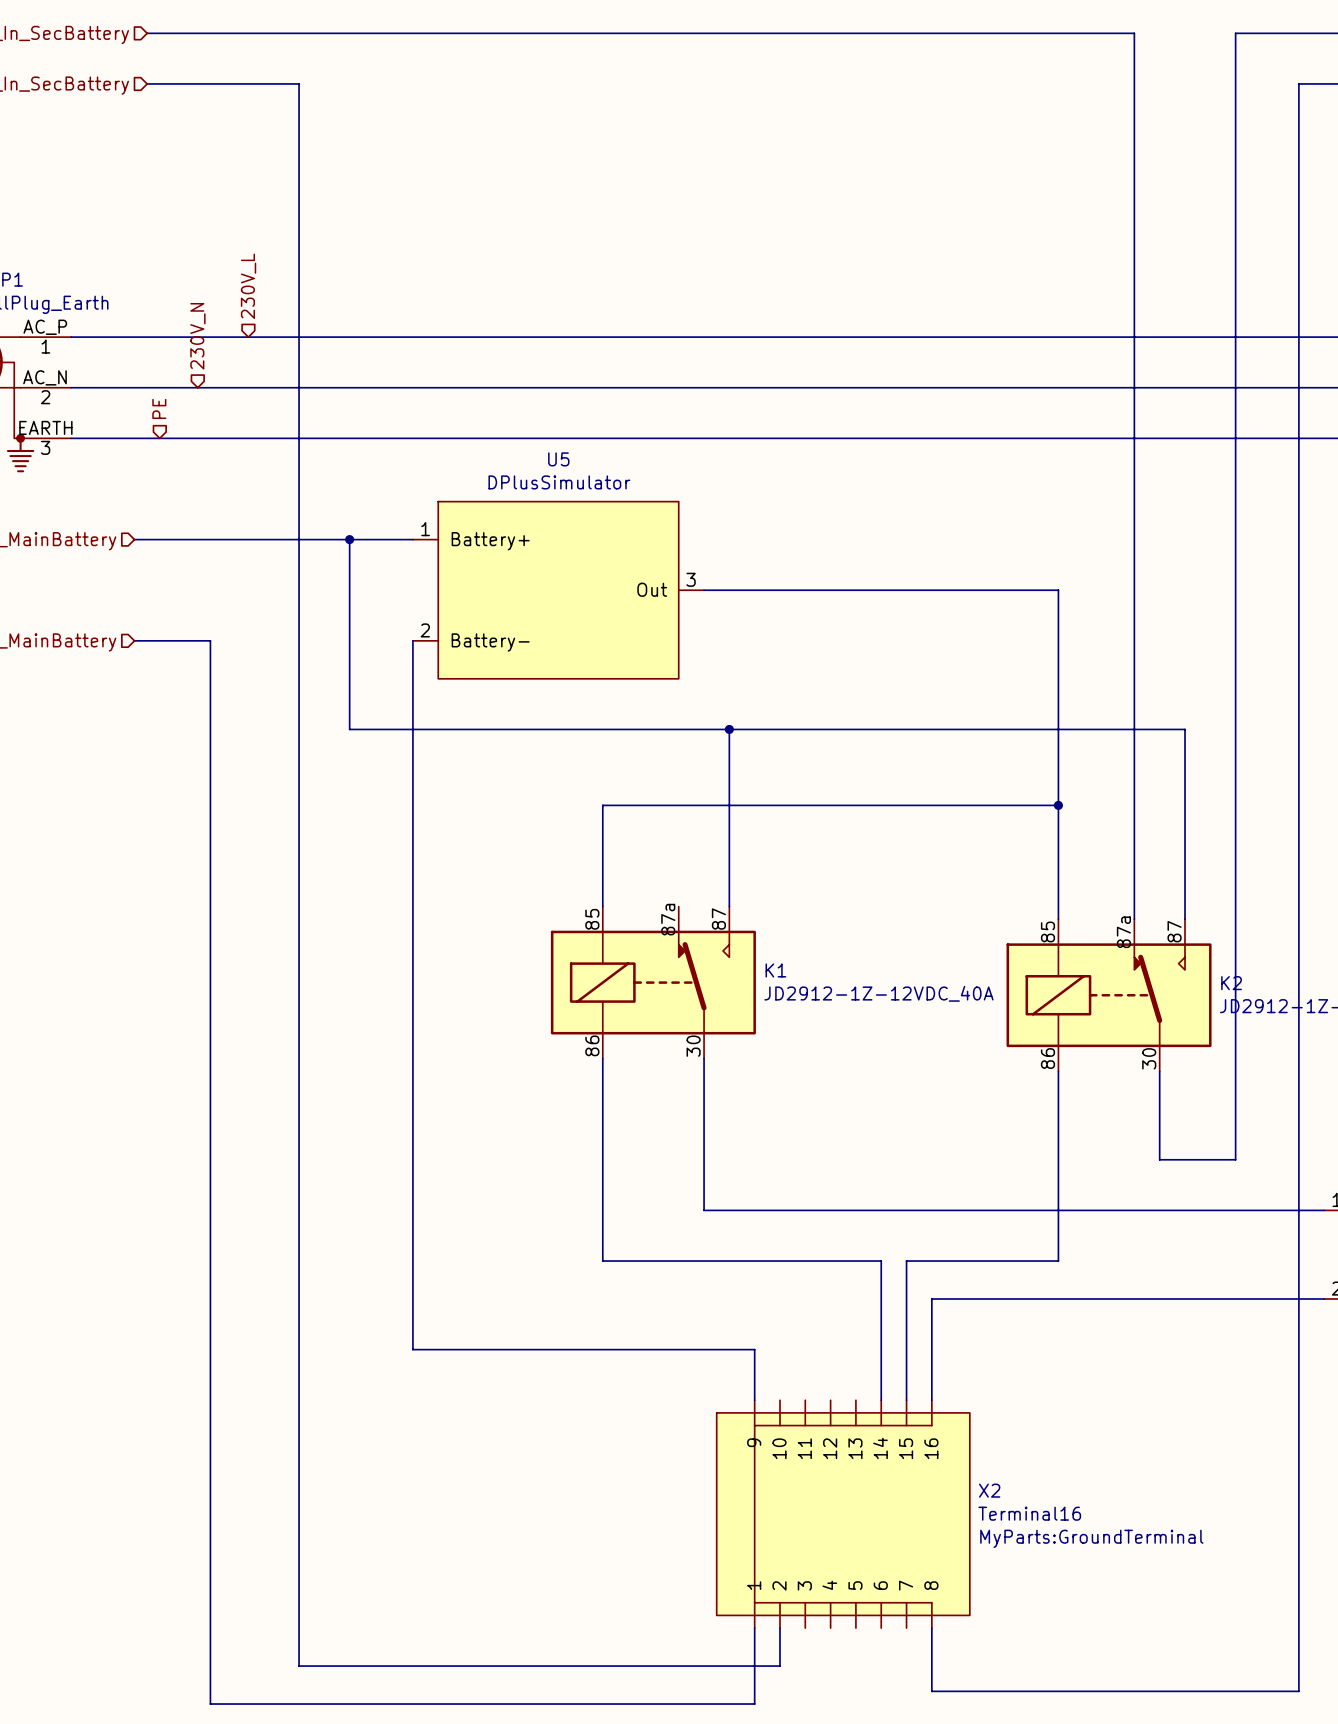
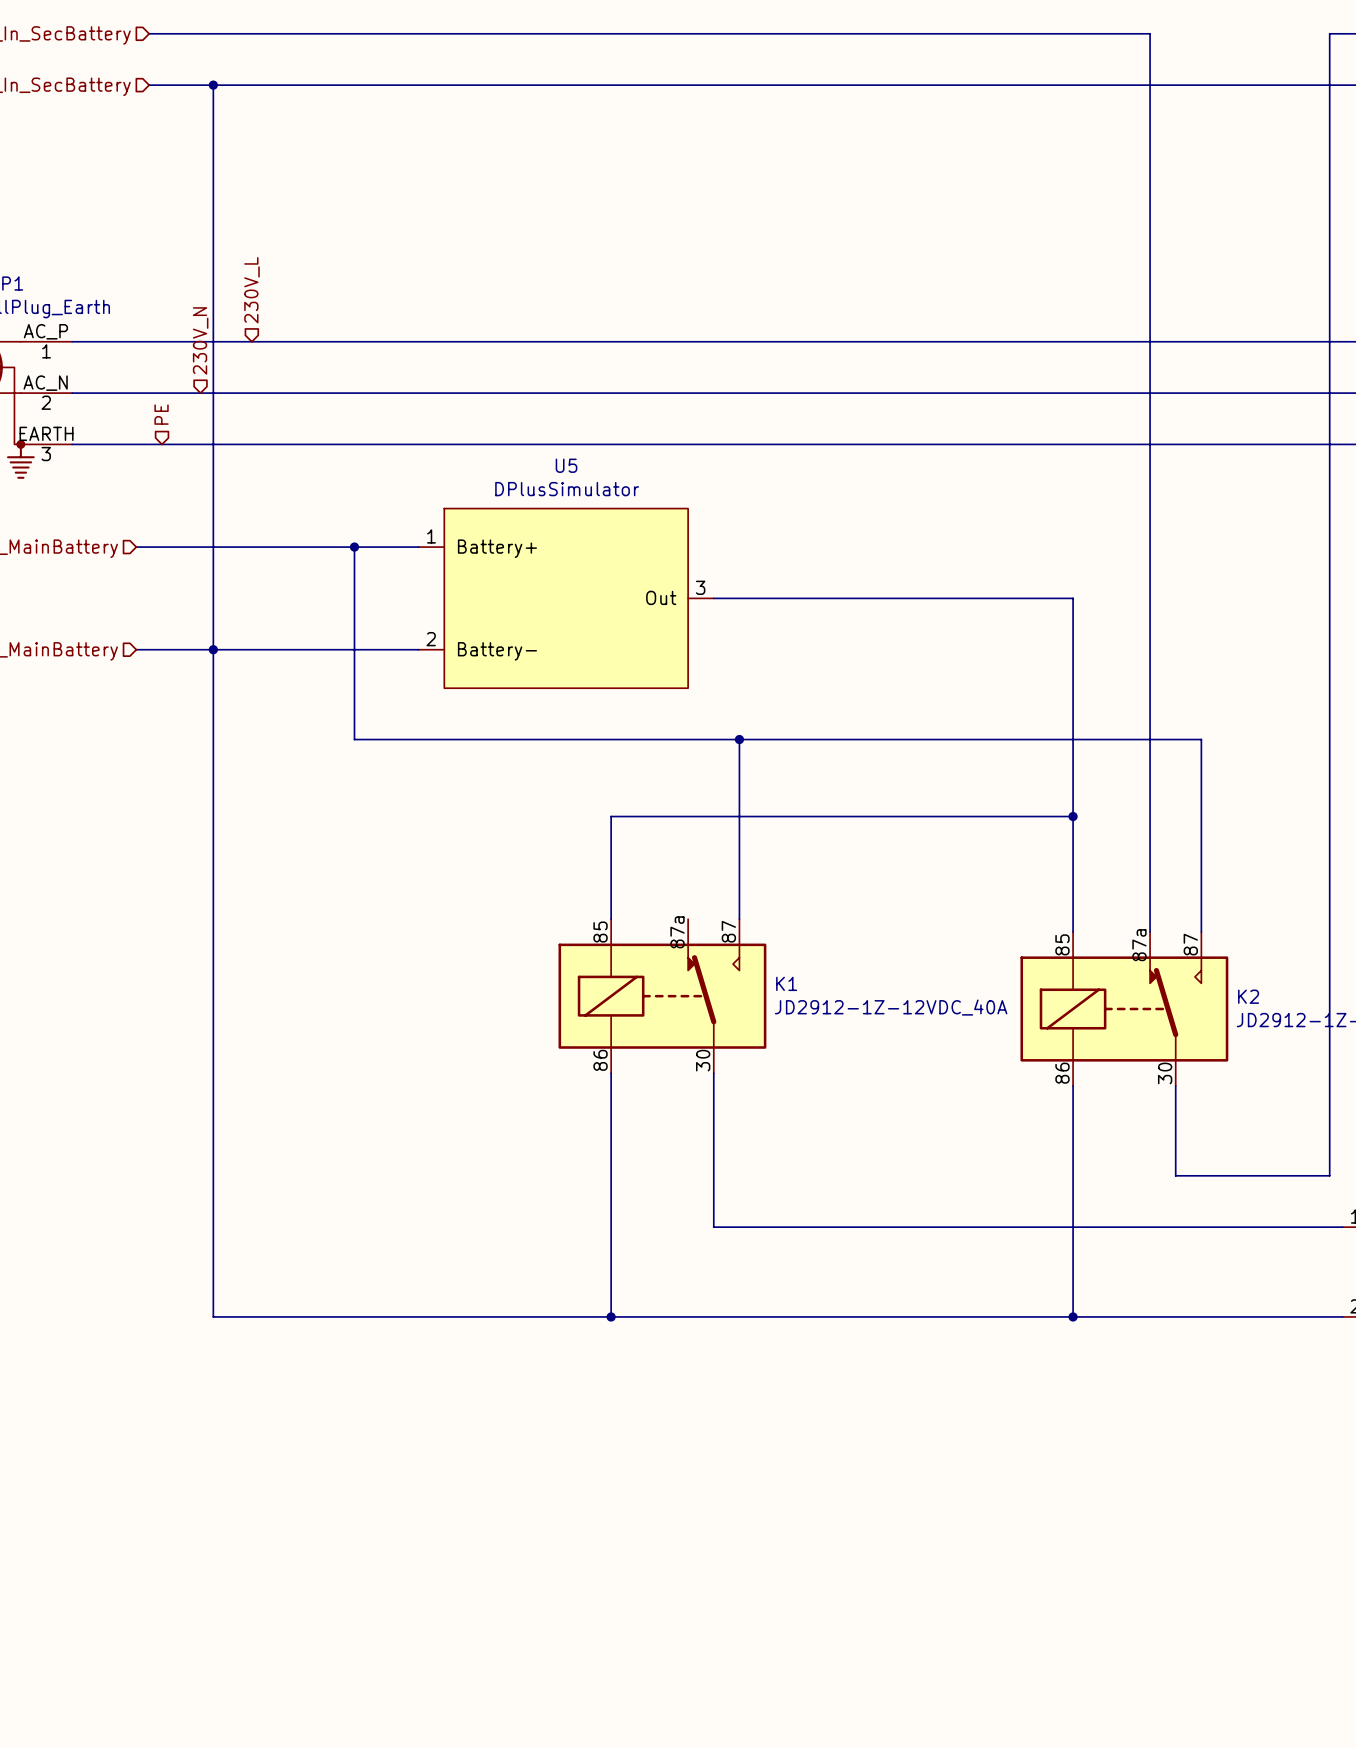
wire: (1311, 33) (1235, 33) (1235, 1159) -> (1329, 33) (1329, 1175) (1252, 1175)
junction: none -> (213, 85)
wire: (299, 83) (299, 1666) (779, 1666) (779, 1628) -> (303, 85) (1316, 85)
wire: (1298, 83) (1298, 1691) (931, 1691) (931, 1628) -> none
junction: none -> (213, 649)
wire: (412, 640) (412, 1349) (754, 1349) (754, 1400) -> (418, 649) (213, 649) (213, 85)
wire: (602, 1261) (881, 1261) (881, 1400) -> (611, 1278) (611, 1316)
wire: (1058, 1261) (906, 1261) (906, 1400) -> (1073, 1278) (1073, 1316)
wire: (210, 1299) (210, 1704) (754, 1704) (754, 1628) -> (213, 1316) (944, 1316)
junction: none -> (611, 1316)
wire: (931, 1299) (931, 1400) -> none
junction: none -> (1073, 1316)
X2: Terminal16 (843, 1514) -> none

